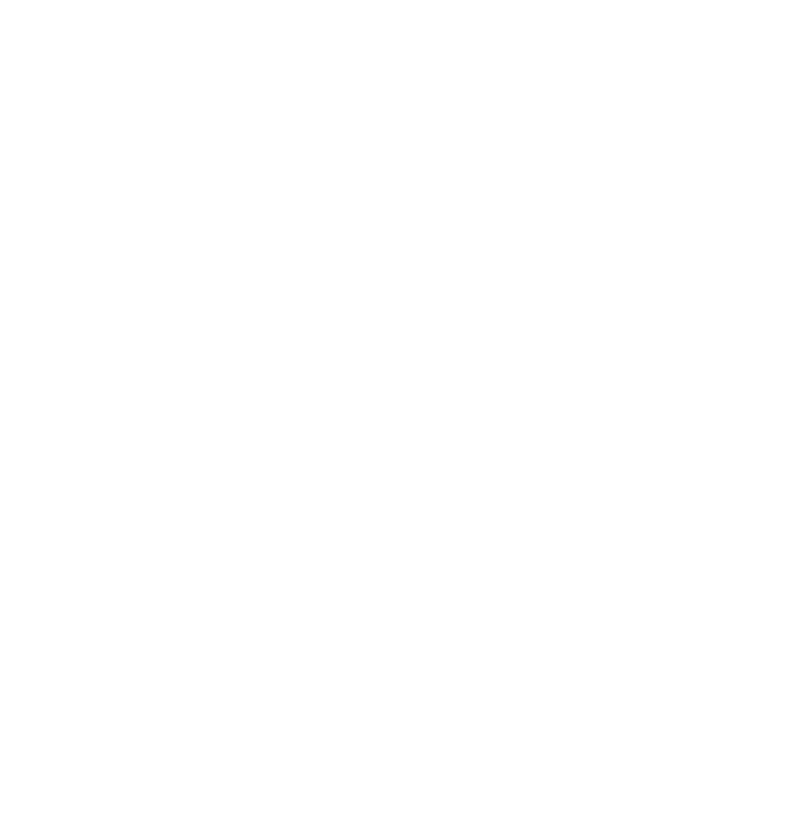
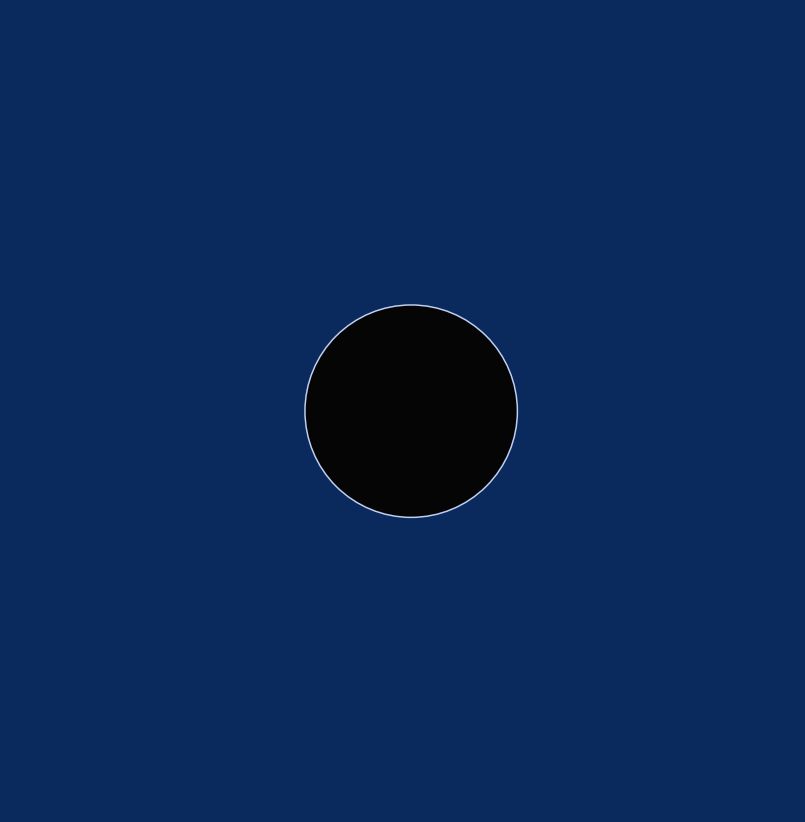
part: none -> (411, 411)

